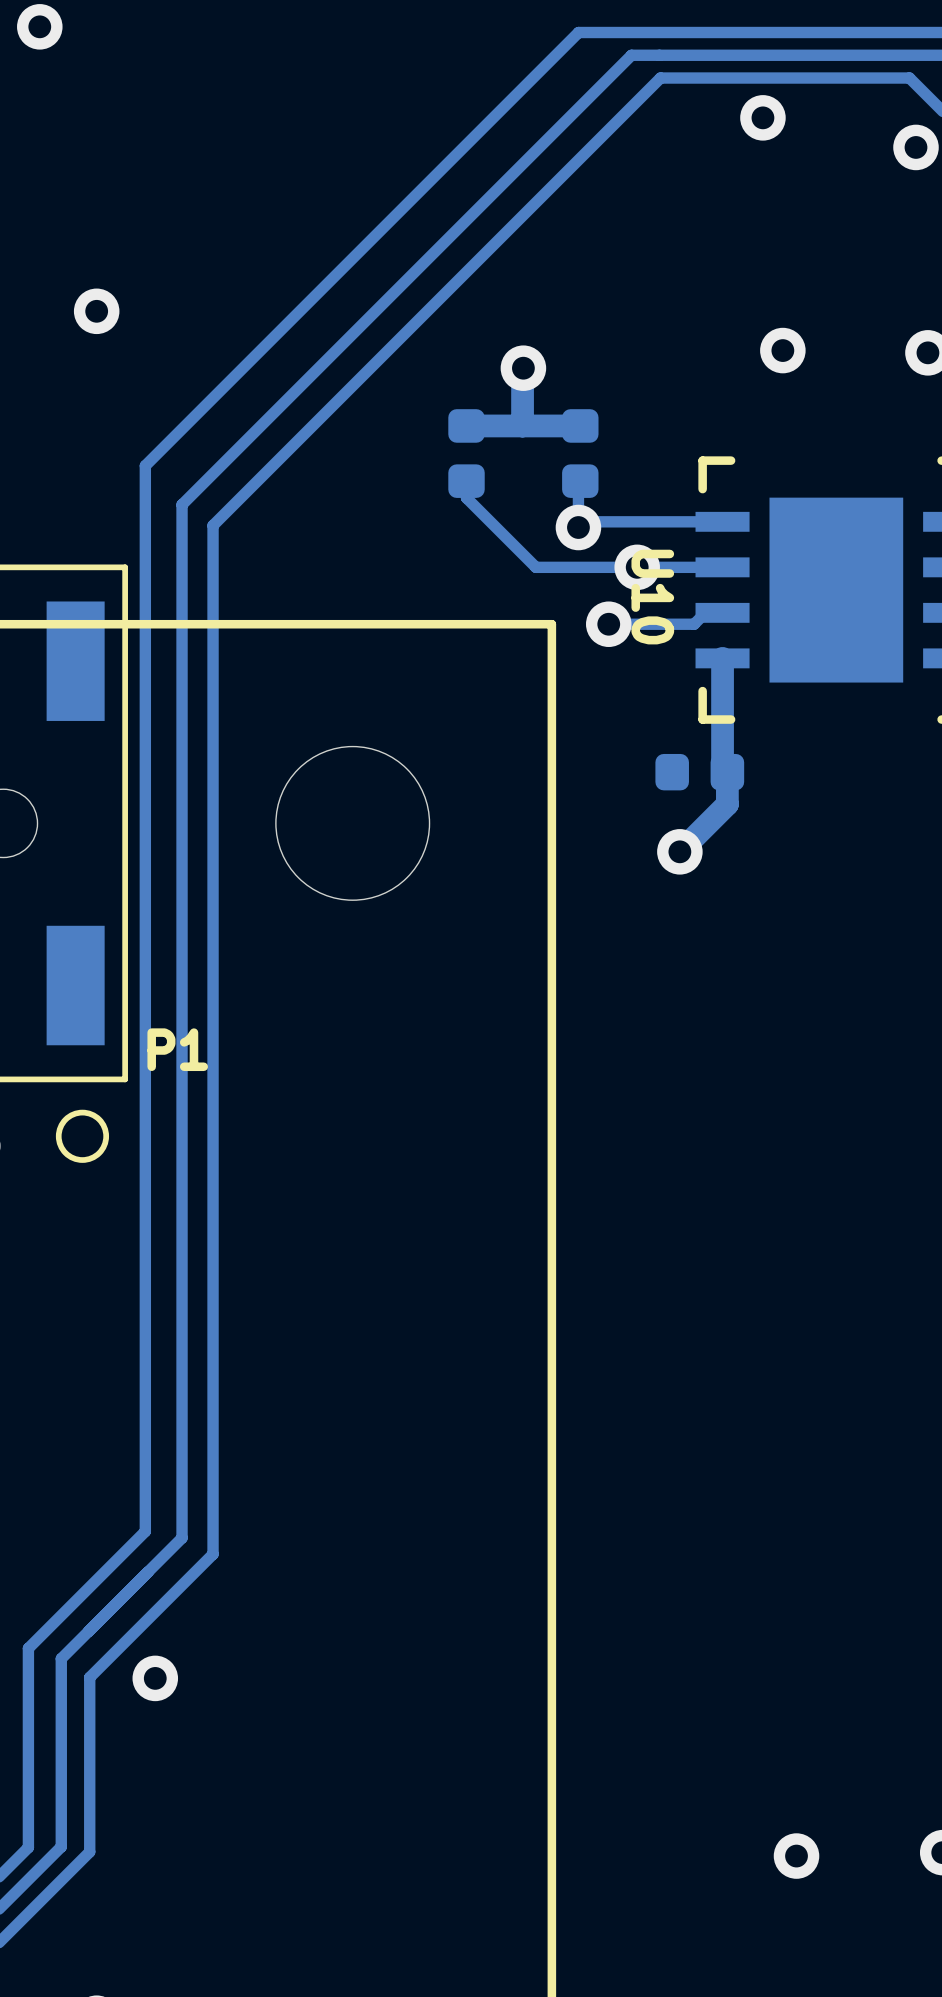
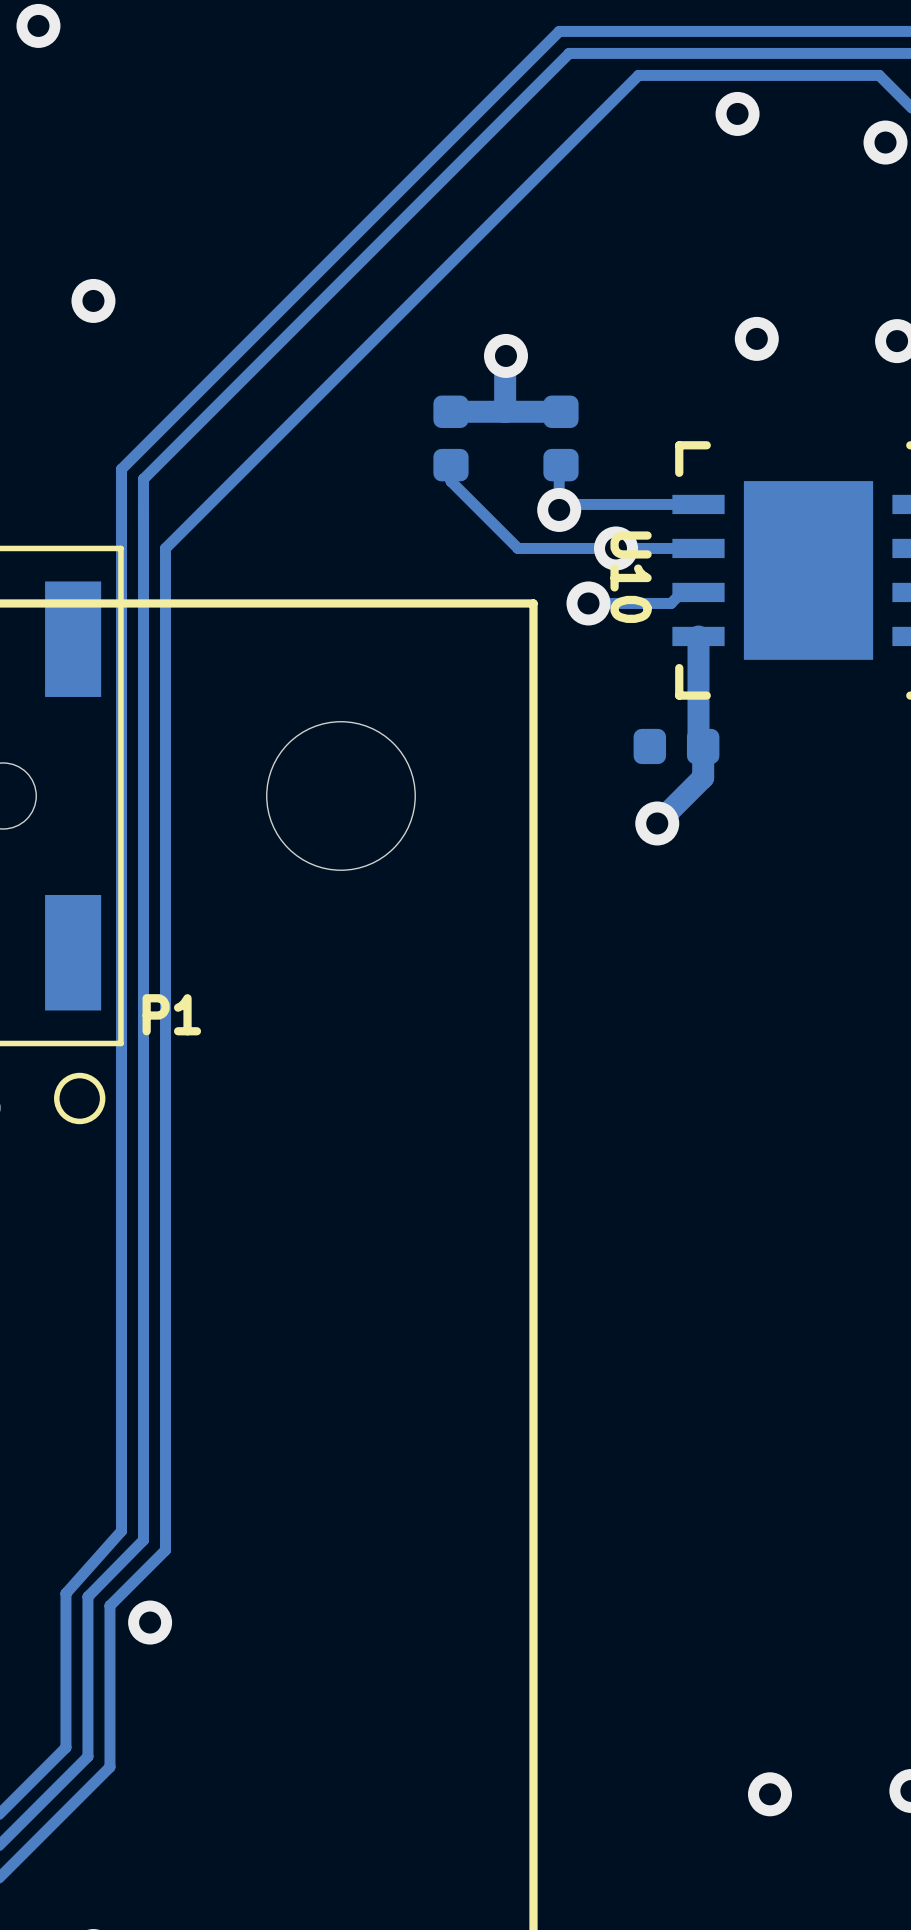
track: (631, 55) (182, 504) (182, 1538) (61, 1658) (61, 1846) -> (610, 53) (569, 53) (143, 479) (143, 1540) (87, 1596) (87, 1756) (59, 1785)
track: (145, 465) (145, 1531) (28, 1648) (28, 1847) -> (140, 450) (121, 469) (121, 1531) (65, 1593) (65, 1747) (27, 1786)
track: (213, 525) (213, 1554) (89, 1677) (89, 1851) -> (205, 508) (165, 548) (165, 1550) (109, 1605) (109, 1767) (86, 1790)

